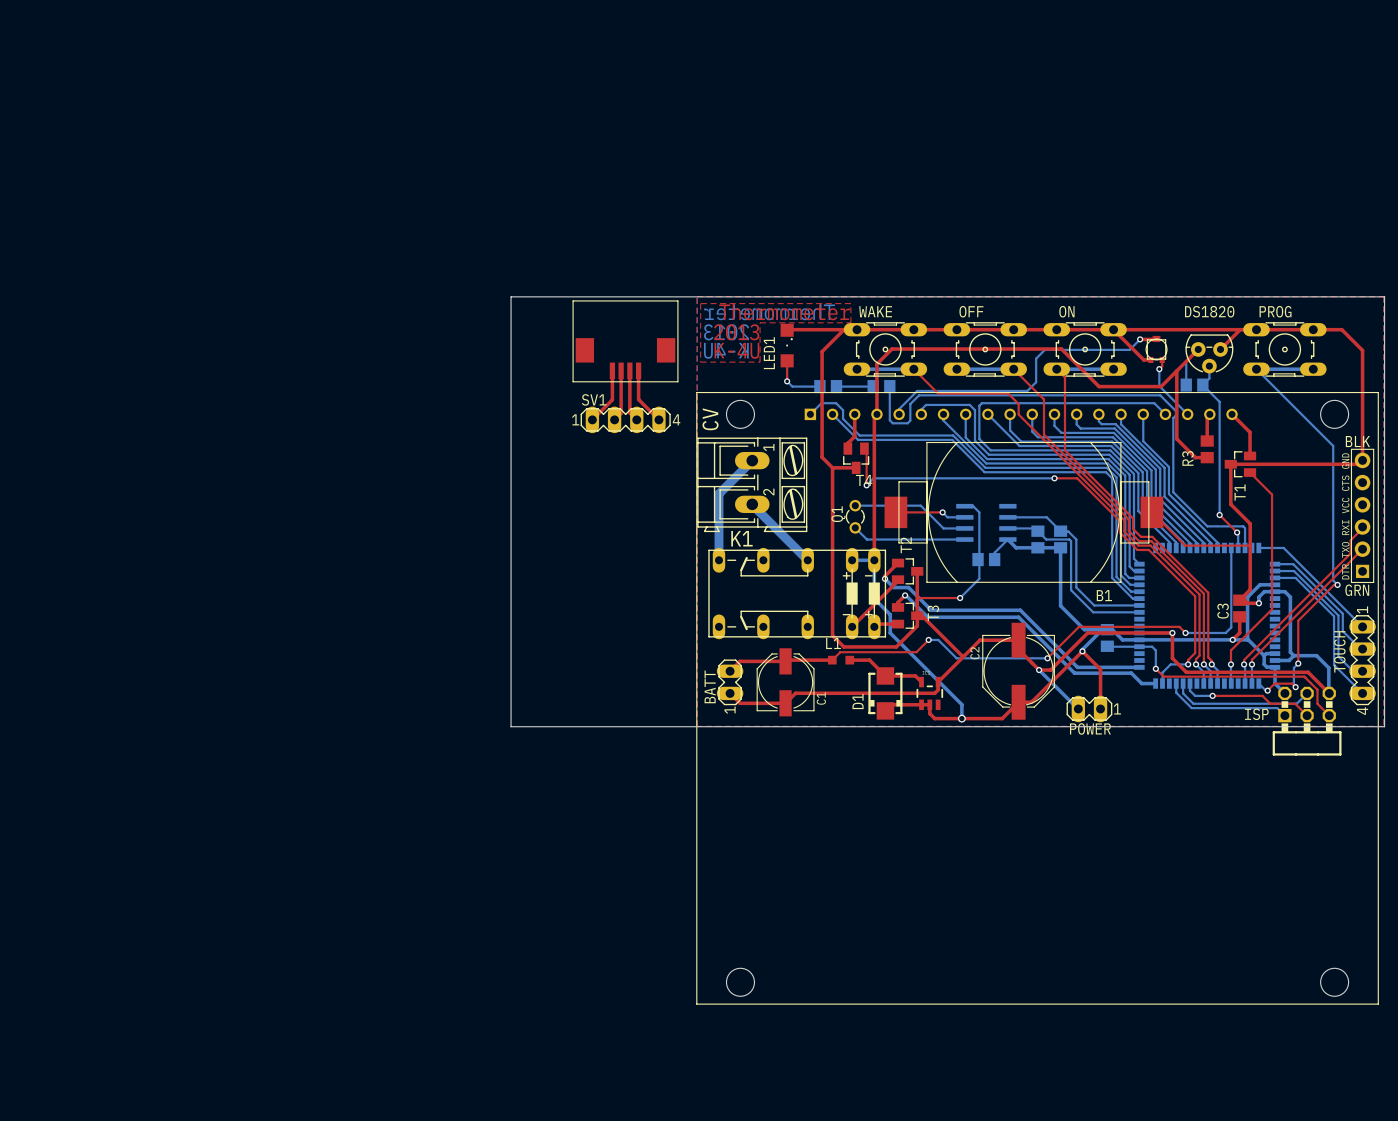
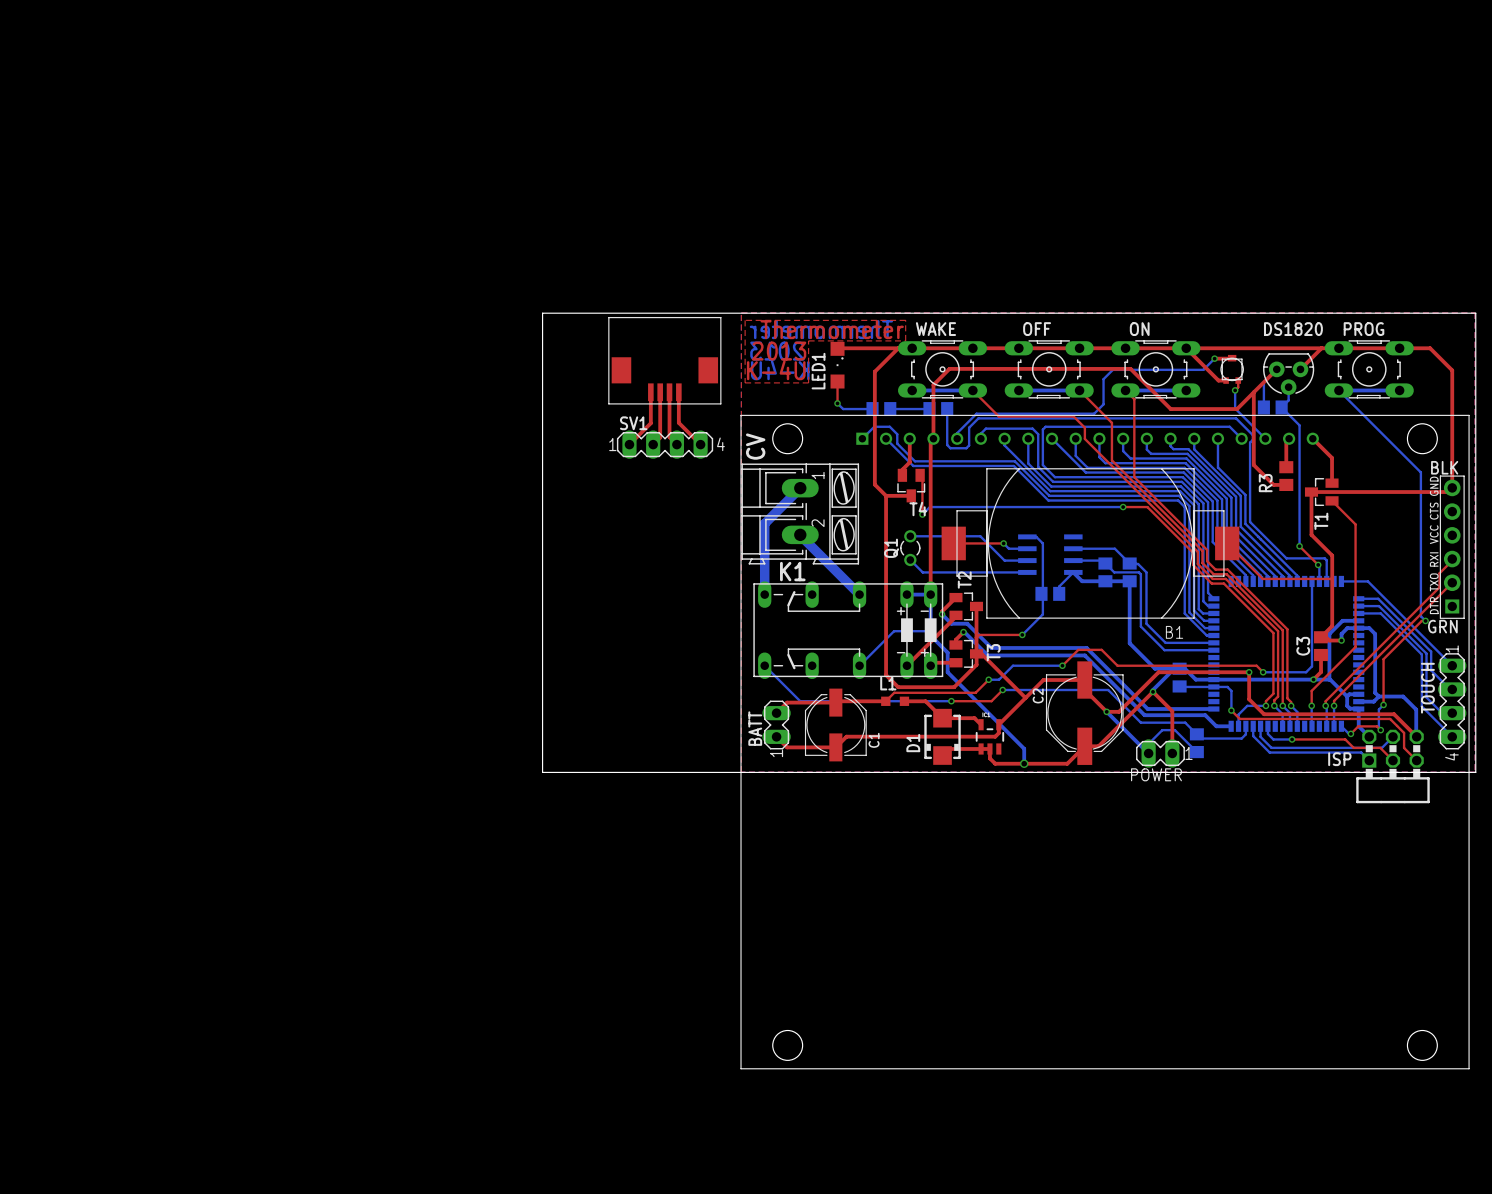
bottom track: none -> (930, 631) (894, 631) (859, 665)
bottom track: none -> (764, 665) (800, 701) (951, 701)
via: none -> (1062, 665)
top track: (1078, 626) (1047, 658) -> (1149, 665) (1117, 665) (1101, 649) (1078, 649) (1062, 665)
bottom track: (938, 639) (956, 658) (1047, 658) -> (999, 679) (1013, 665) (1062, 665)
top track: none -> (1002, 690) (991, 701) (951, 701)
bottom track: none -> (1002, 690) (1108, 690) (1140, 722) (1185, 722) (1201, 738) (1241, 738) (1245, 734) (1245, 726)
via: none -> (1002, 690)
via: (1047, 658) -> none
via: none -> (951, 701)
part: none -> (1196, 743)
bottom track: none -> (1196, 752) (1174, 730) (1162, 730) (1148, 743) (1148, 753)

